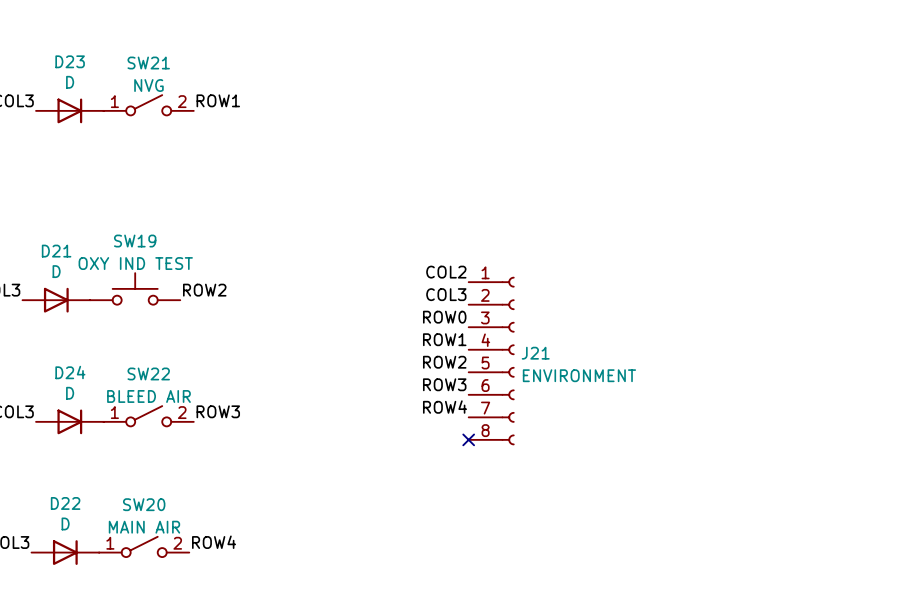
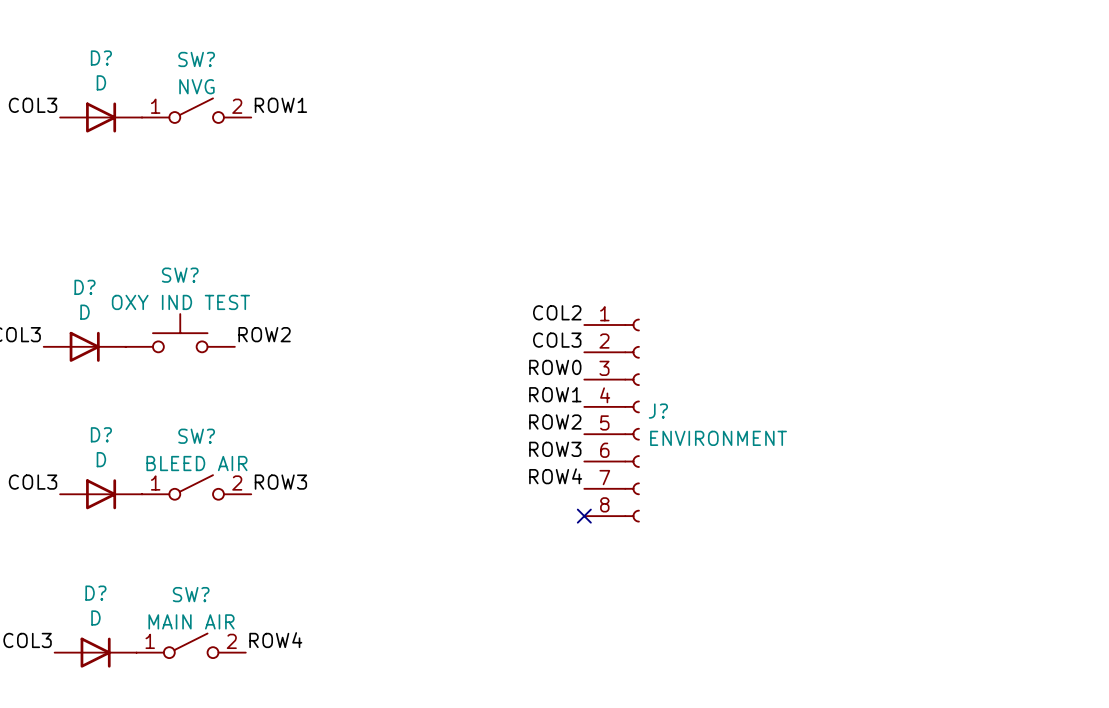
D23 name: D23 (70, 61) -> D? (101, 58)
SW21 name: SW21 (148, 63) -> SW? (196, 59)
SW19 name: SW19 (135, 241) -> SW? (180, 275)
D21 name: D21 (56, 251) -> D? (85, 287)
J21 name: J21 (535, 353) -> J? (658, 411)
D24 name: D24 (70, 372) -> D? (101, 434)
SW22 name: SW22 (148, 373) -> SW? (196, 436)
D22 name: D22 (65, 503) -> D? (95, 593)
SW20 name: SW20 (144, 504) -> SW? (191, 594)

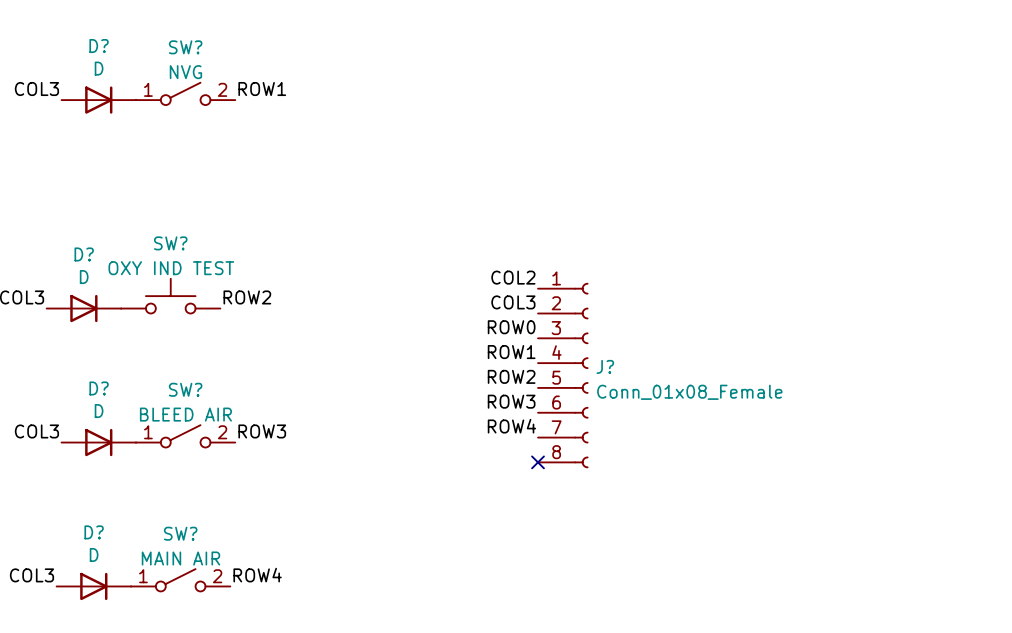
J? value: ENVIRONMENT (718, 438) -> Conn_01x08_Female (689, 392)

